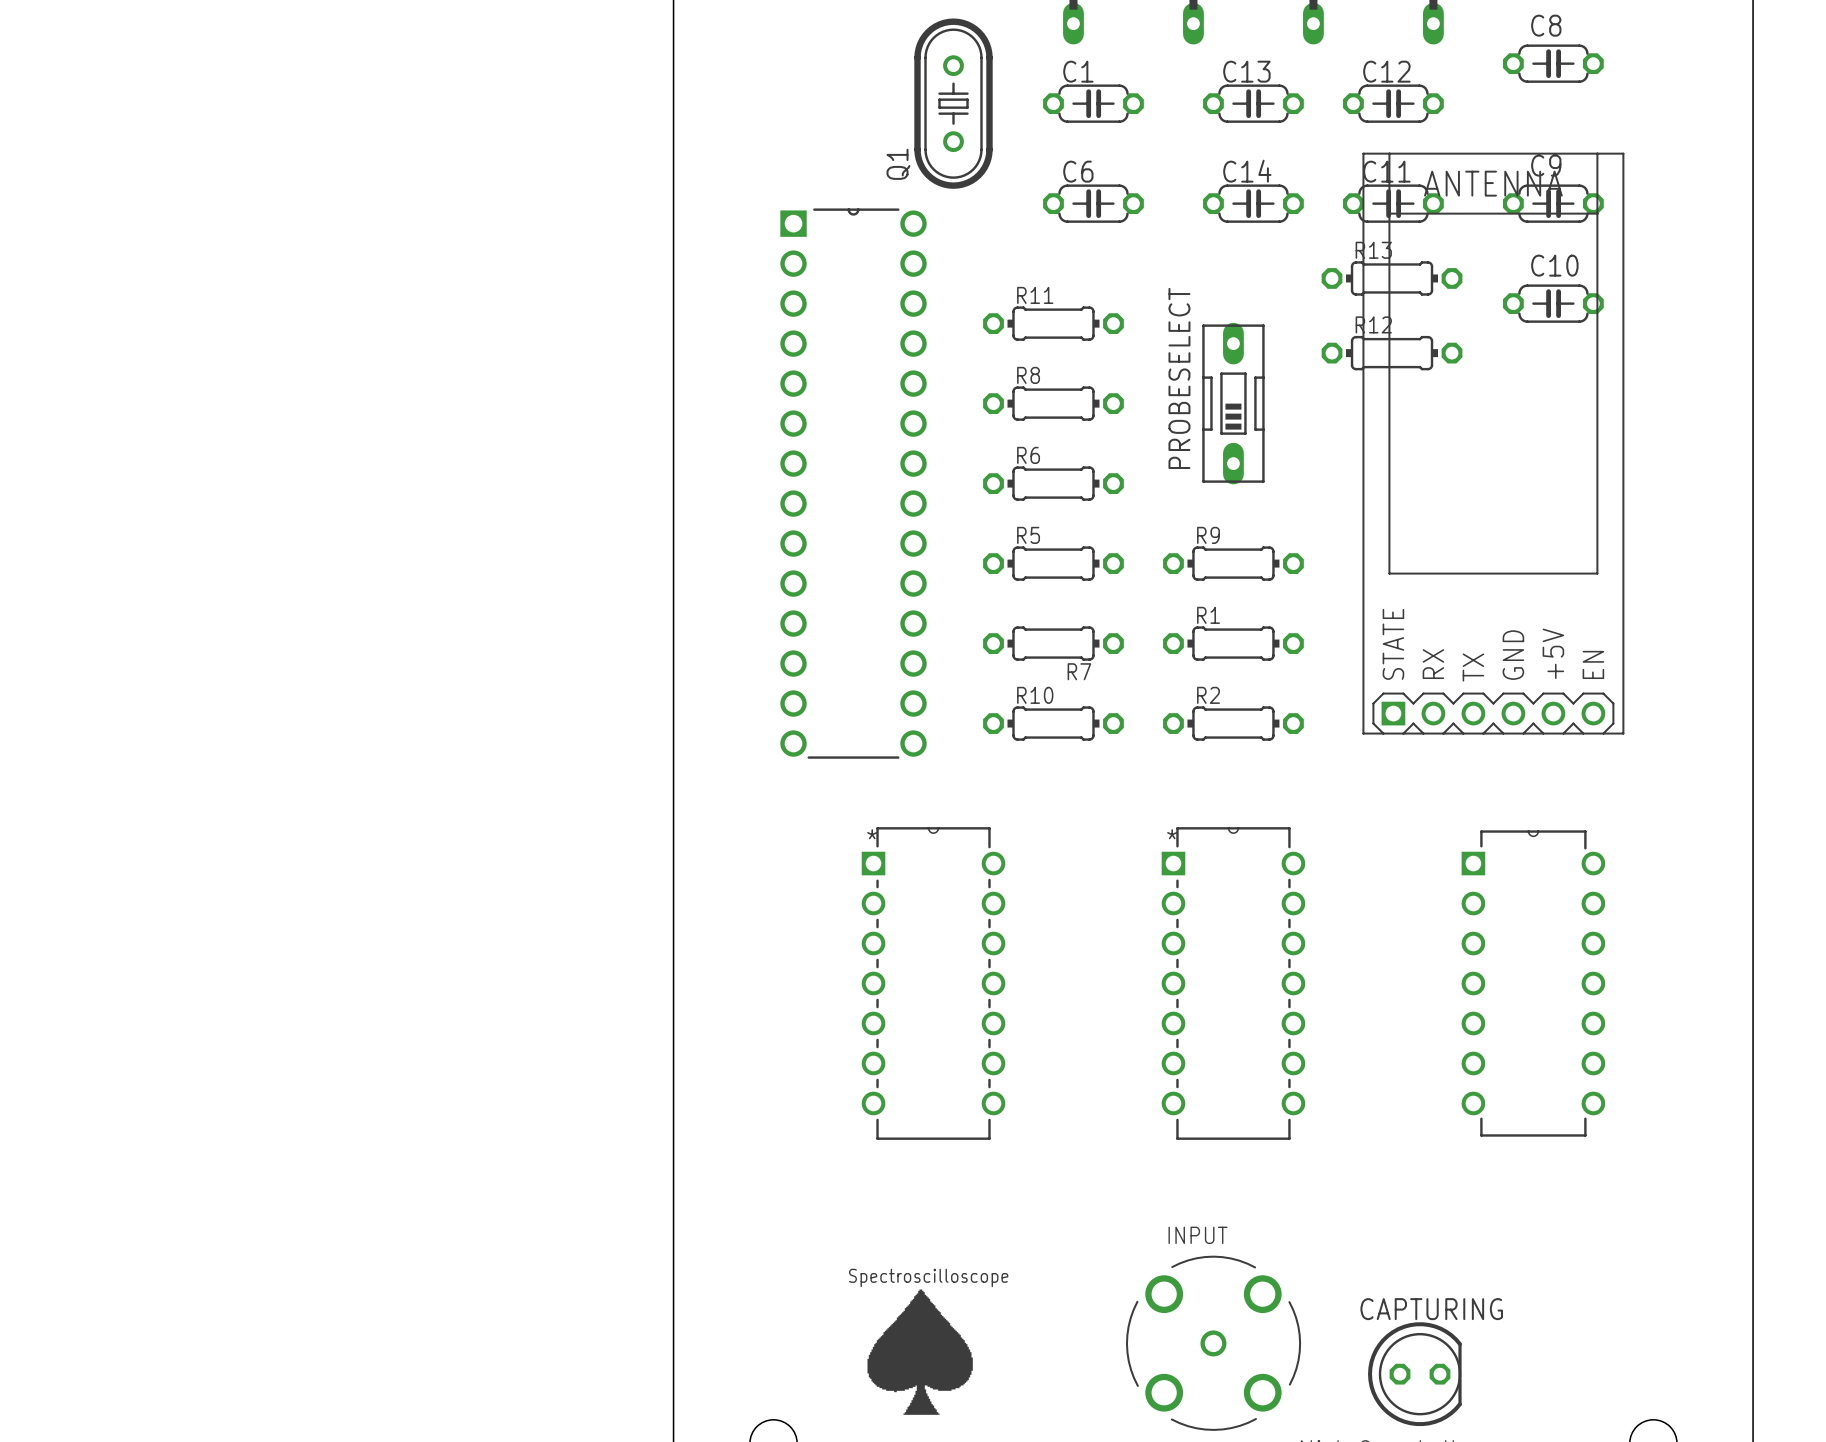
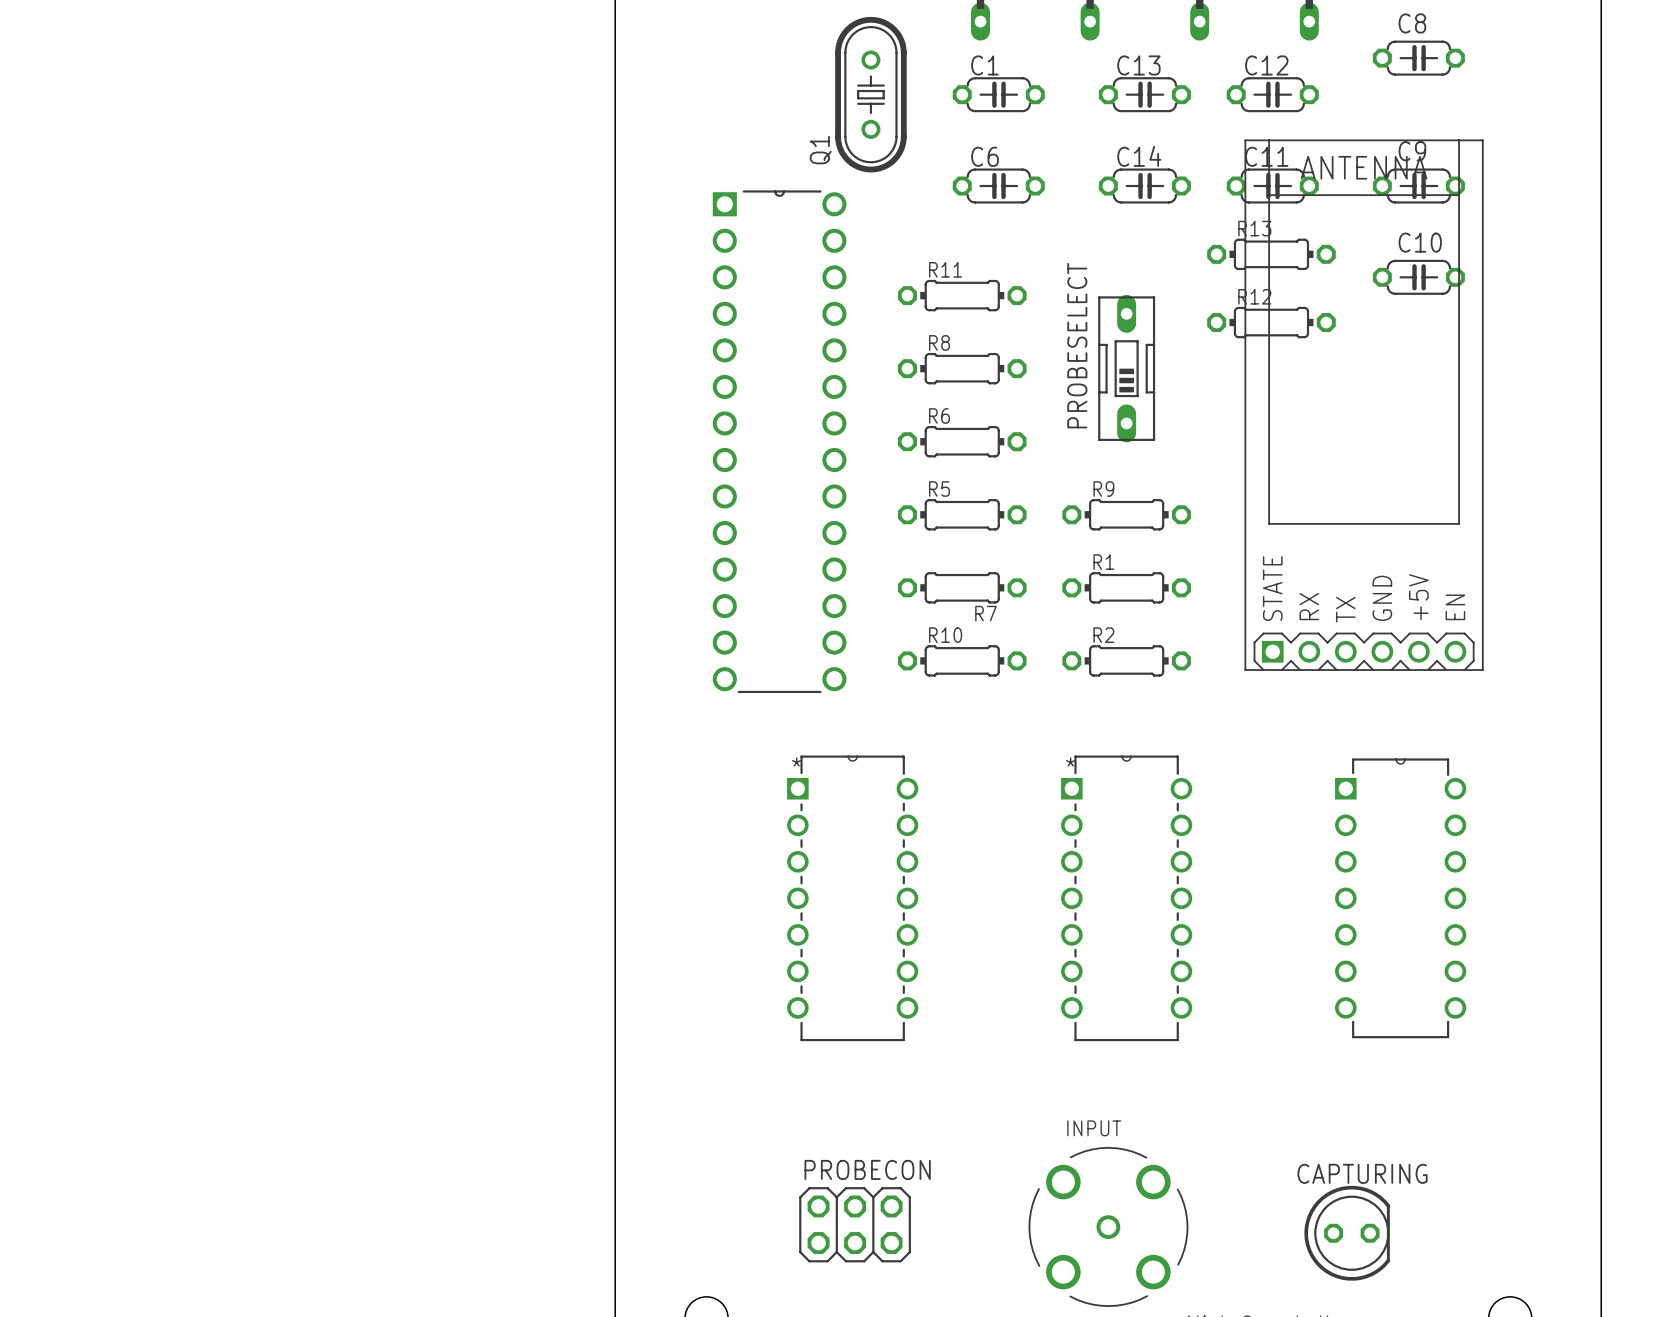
text: Spectroscilloscope (928, 1277) -> none
drawing: [867, 1289, 973, 1415] -> none
PROBECON: none -> (855, 1224)
CAPTURING position: (1415, 1374) -> (1347, 1233)

